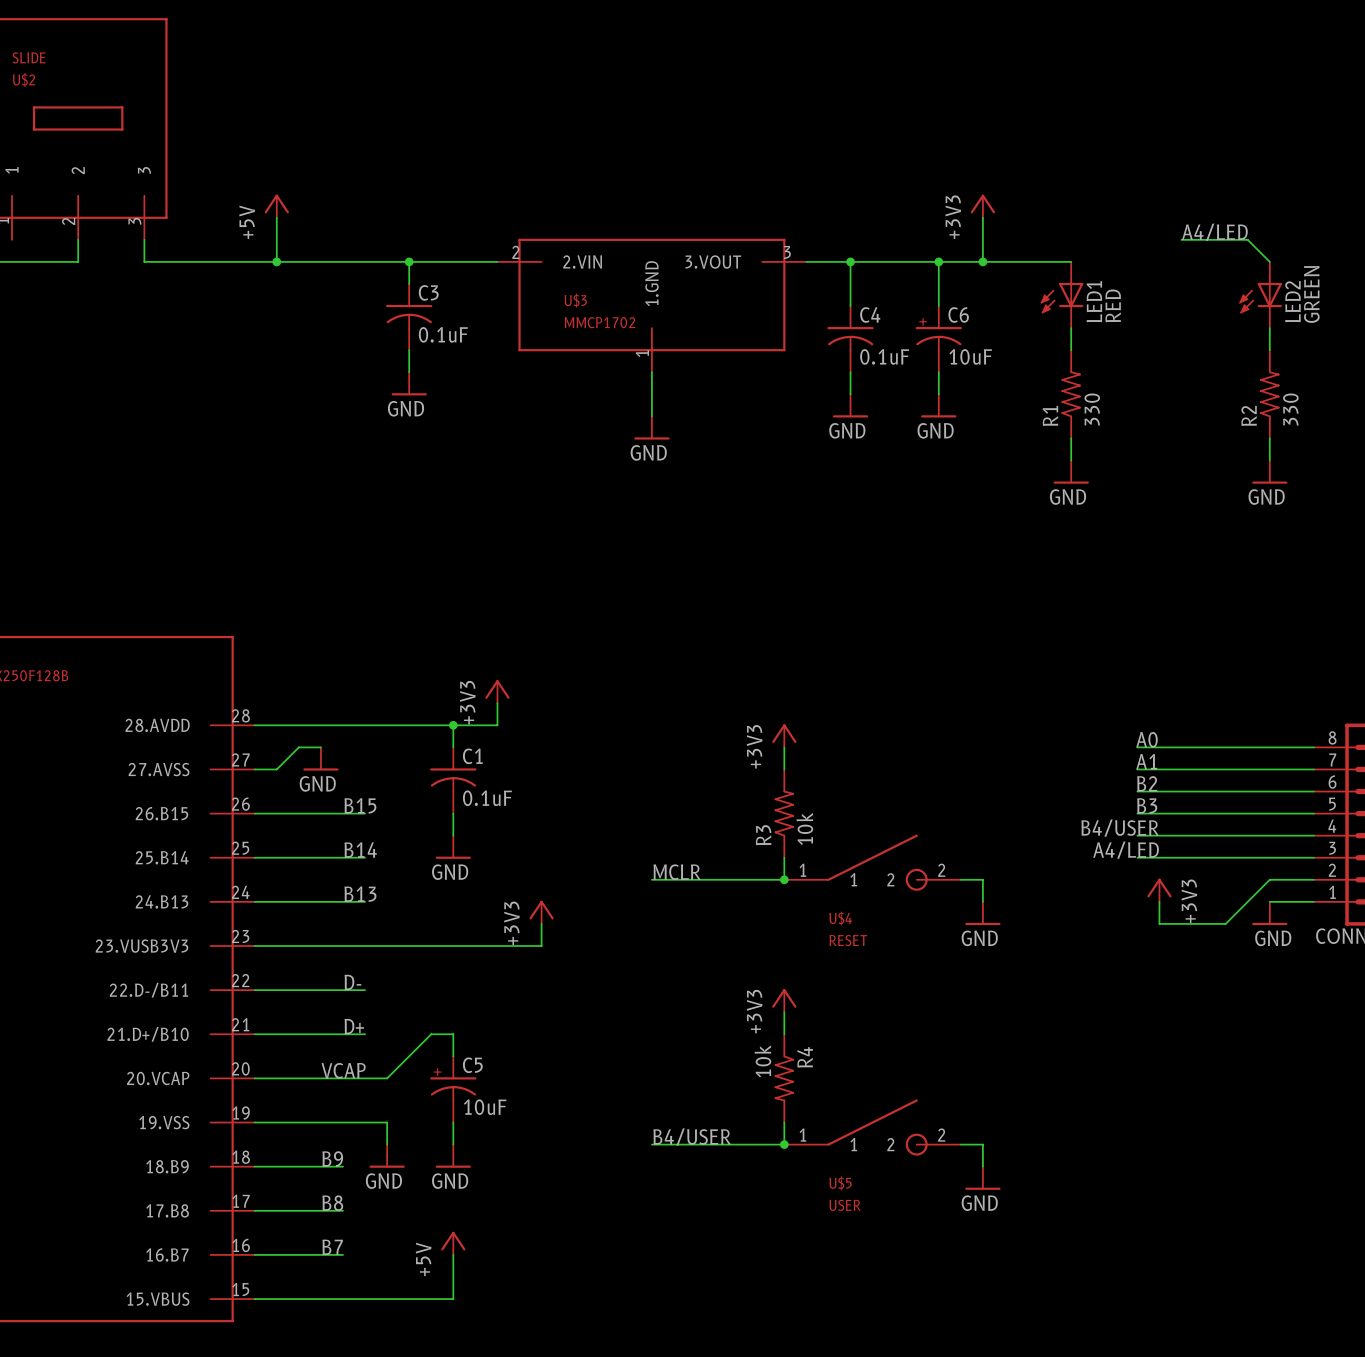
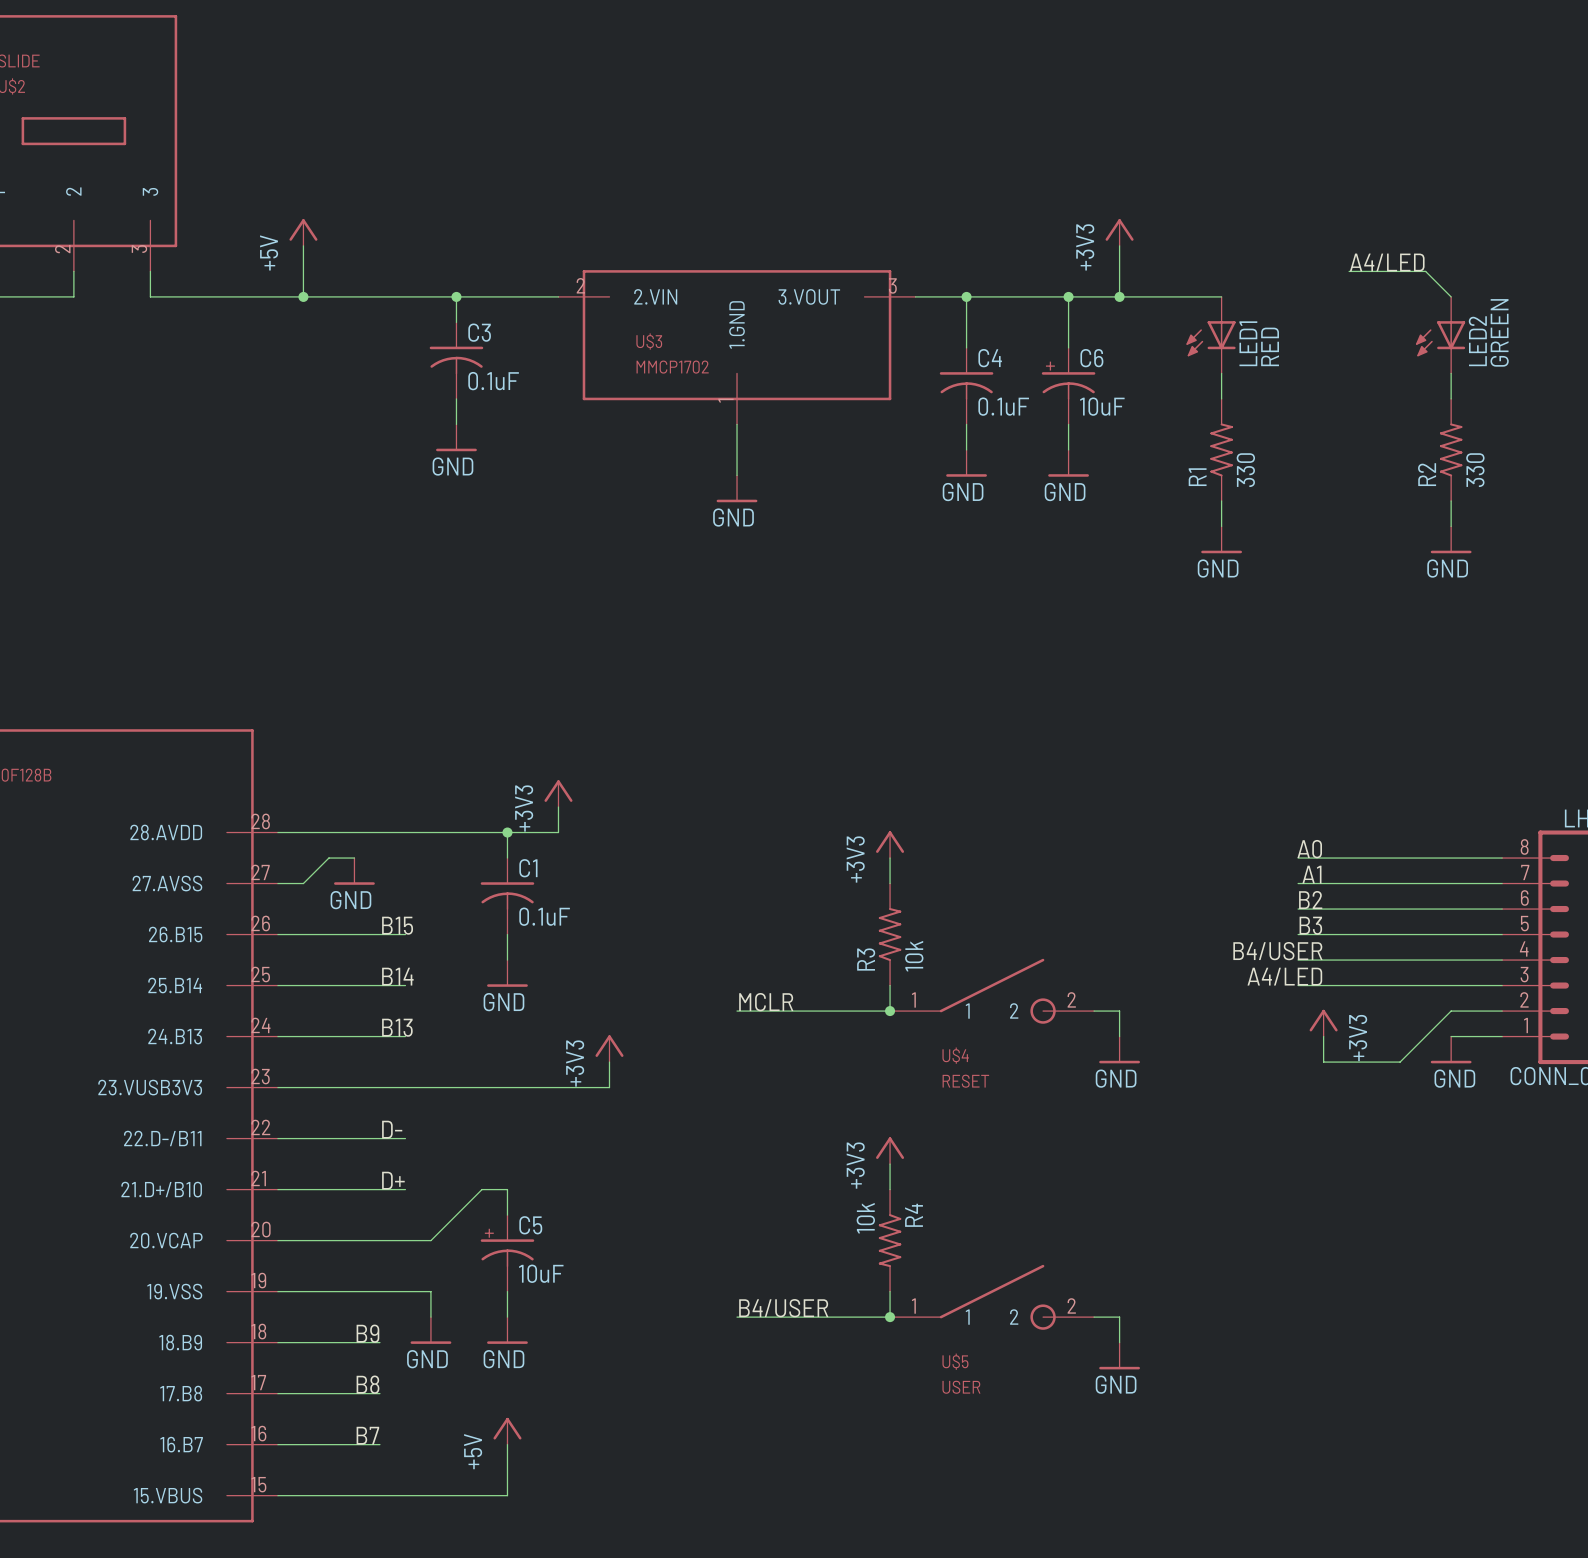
label: VCAP (343, 1070) -> none

